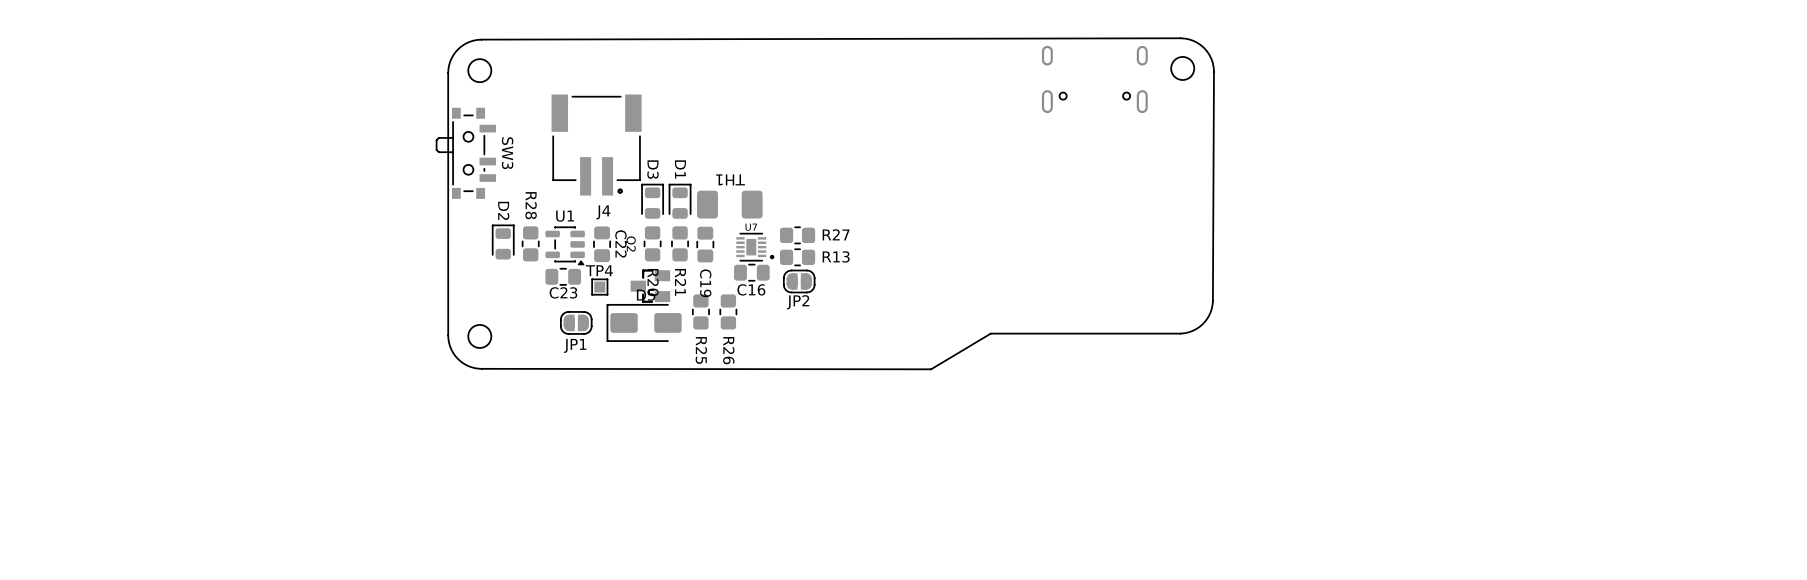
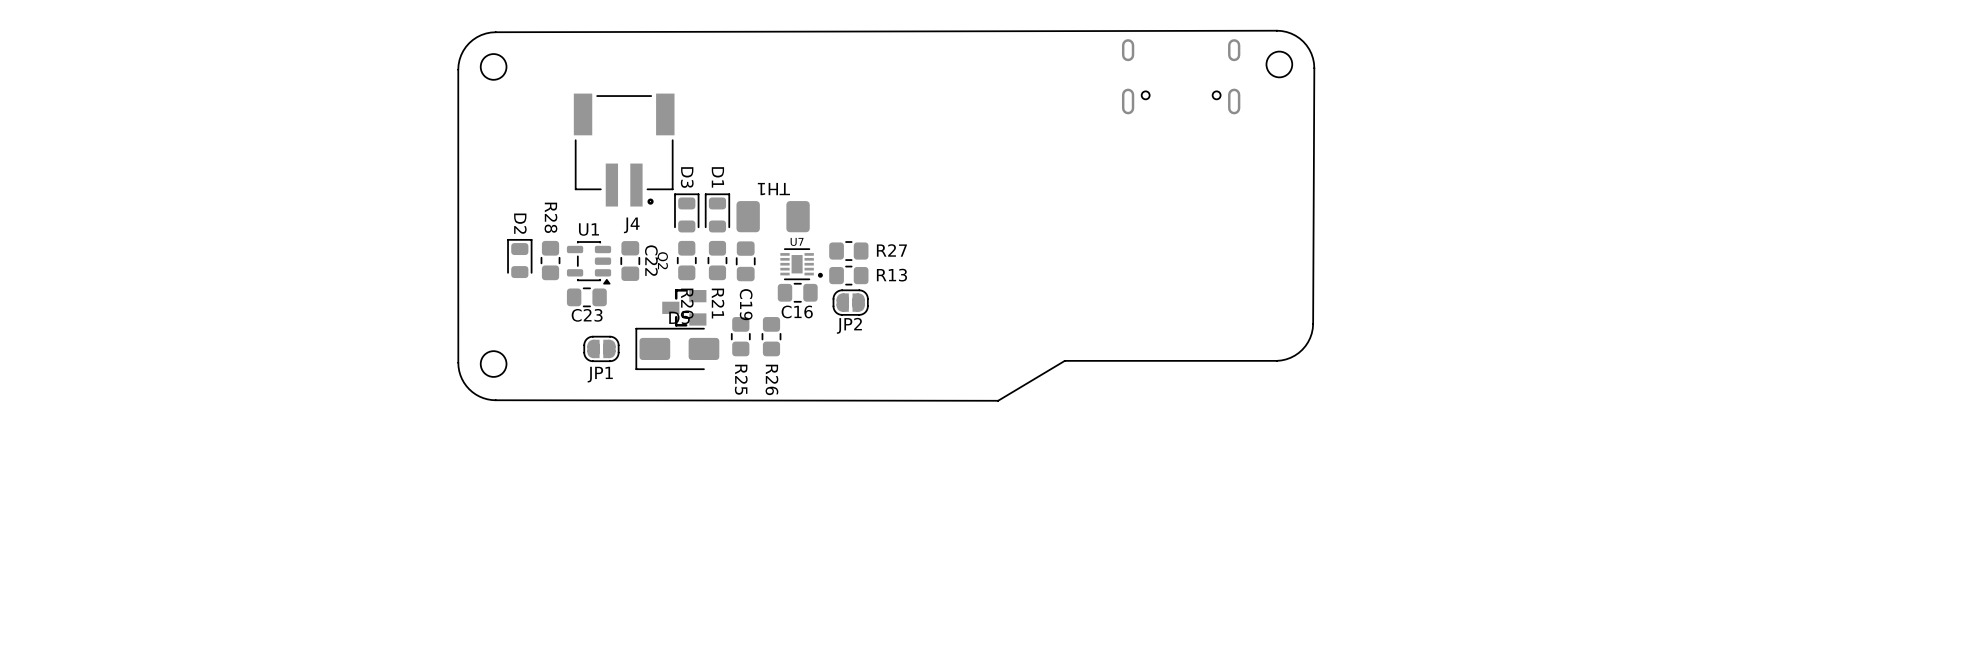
SW3: (465, 153) -> none
TP4: (599, 287) -> none

